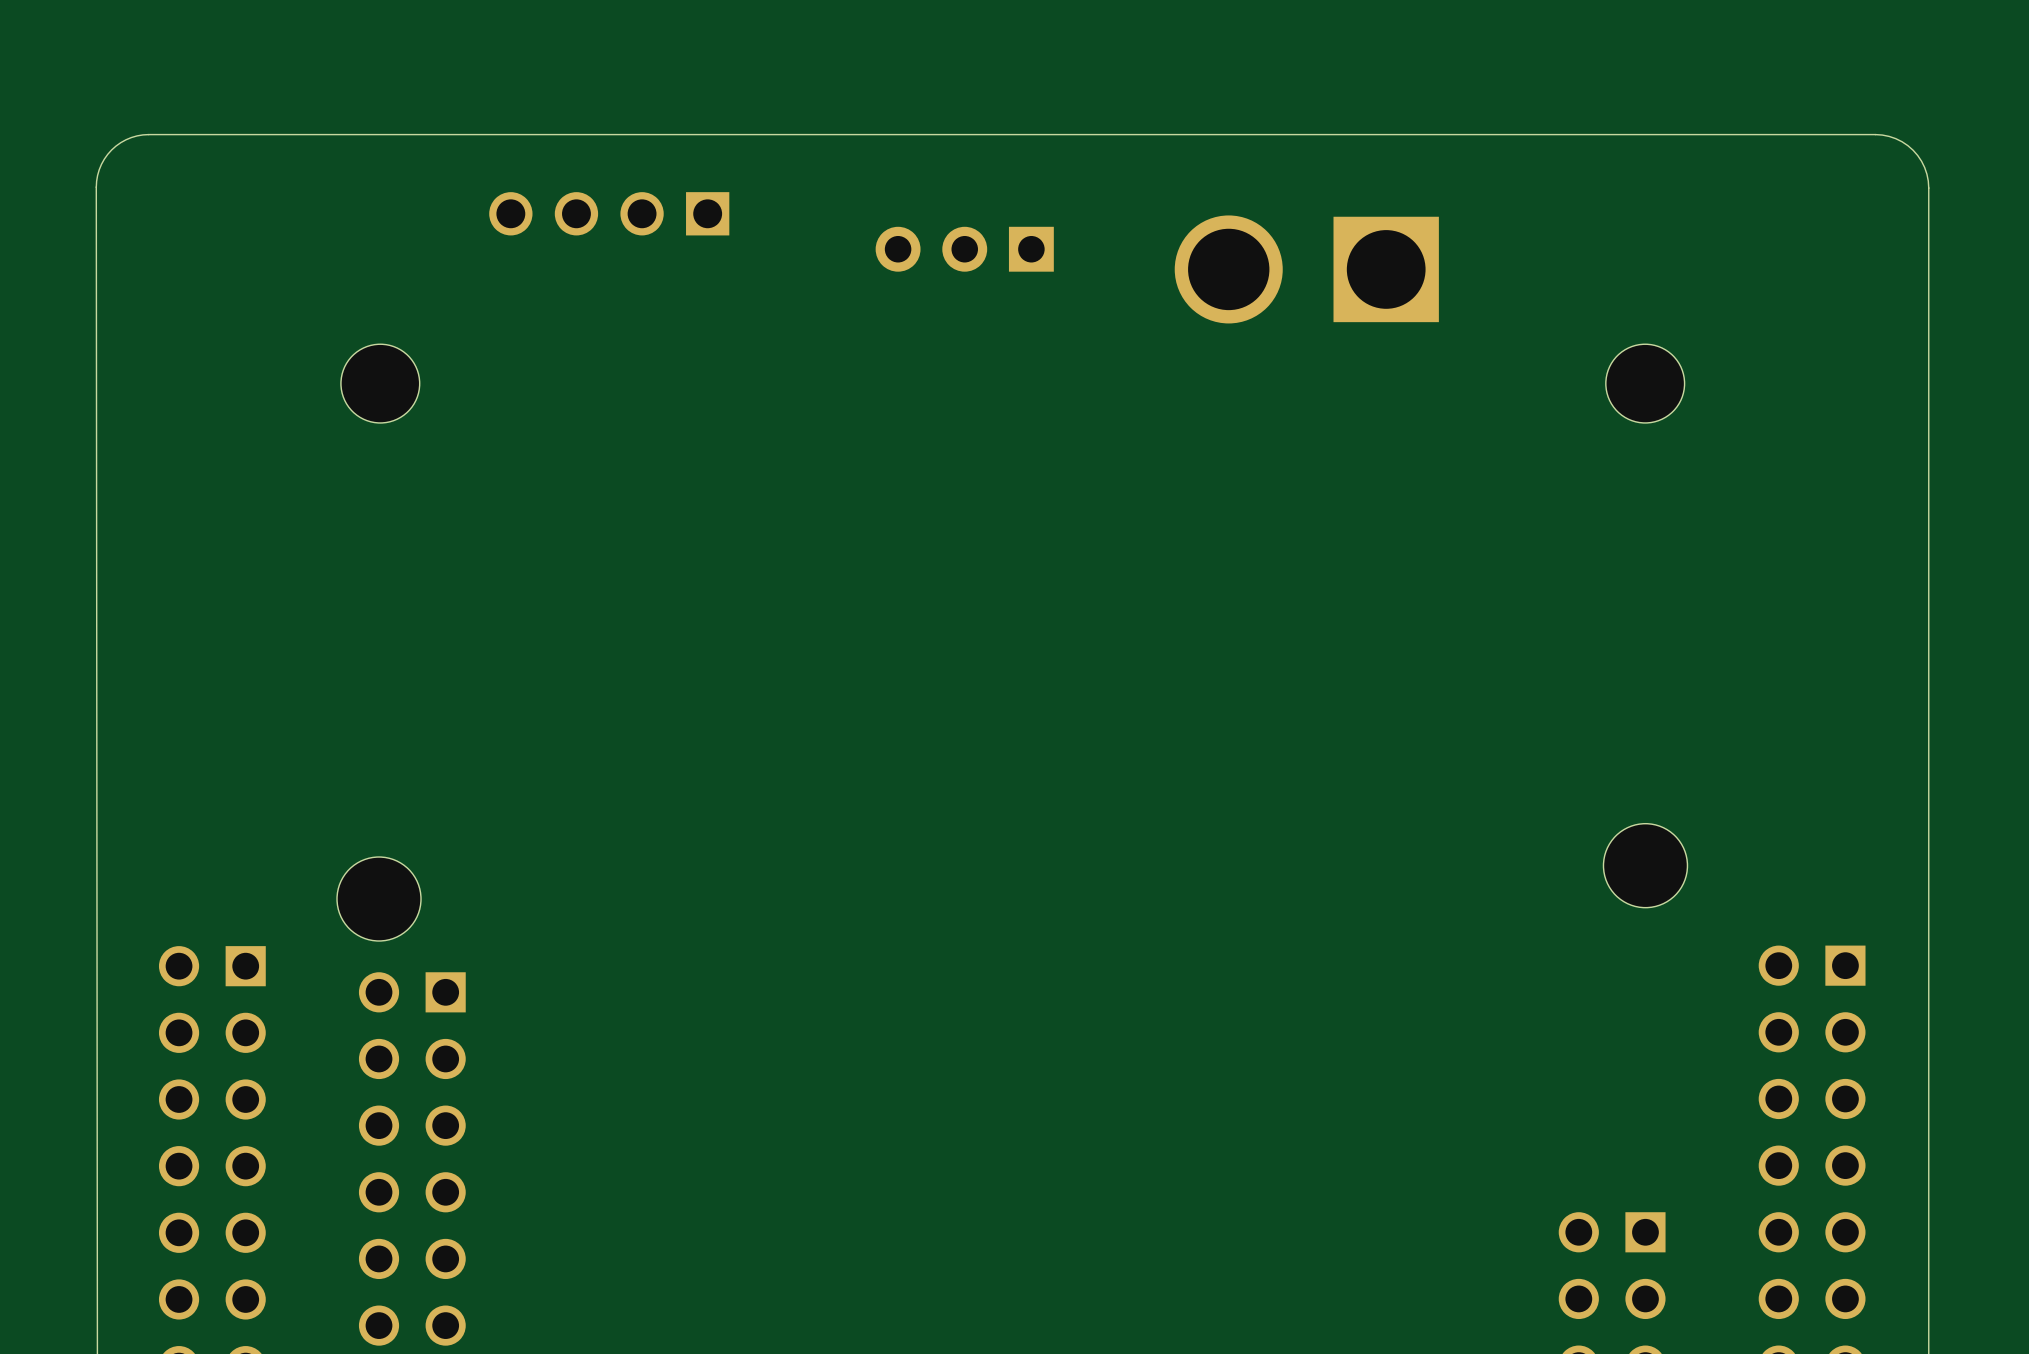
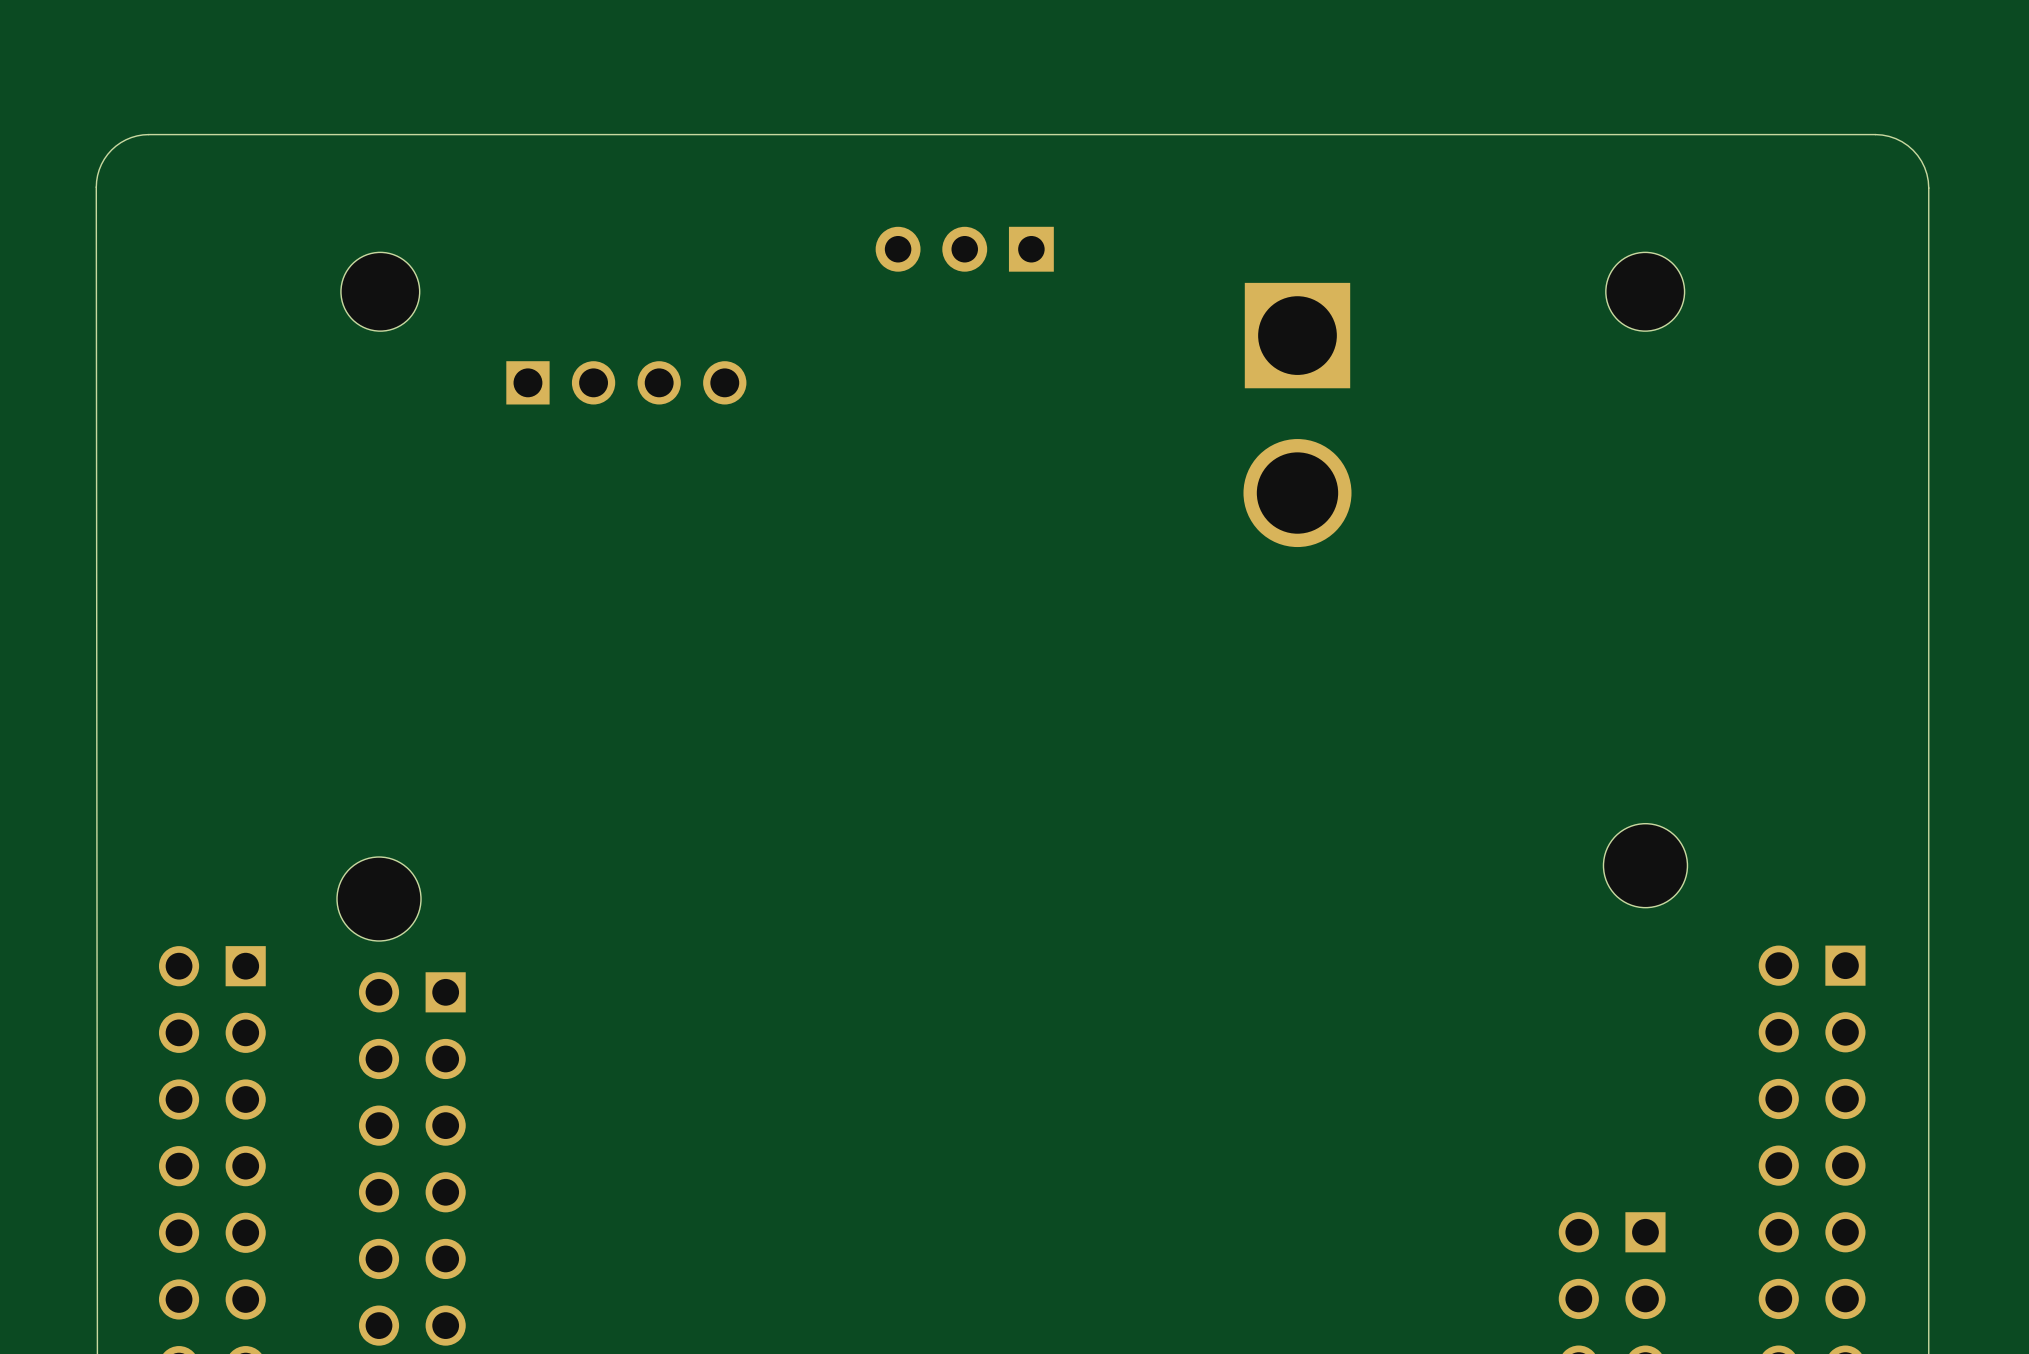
part rotation: 0° (609, 213) -> 180° (626, 382)
part position: (609, 213) -> (626, 382)
part rotation: 0° (1306, 269) -> 90° counterclockwise (1297, 414)
hole position: (380, 383) -> (380, 291)
hole position: (1645, 383) -> (1645, 291)

